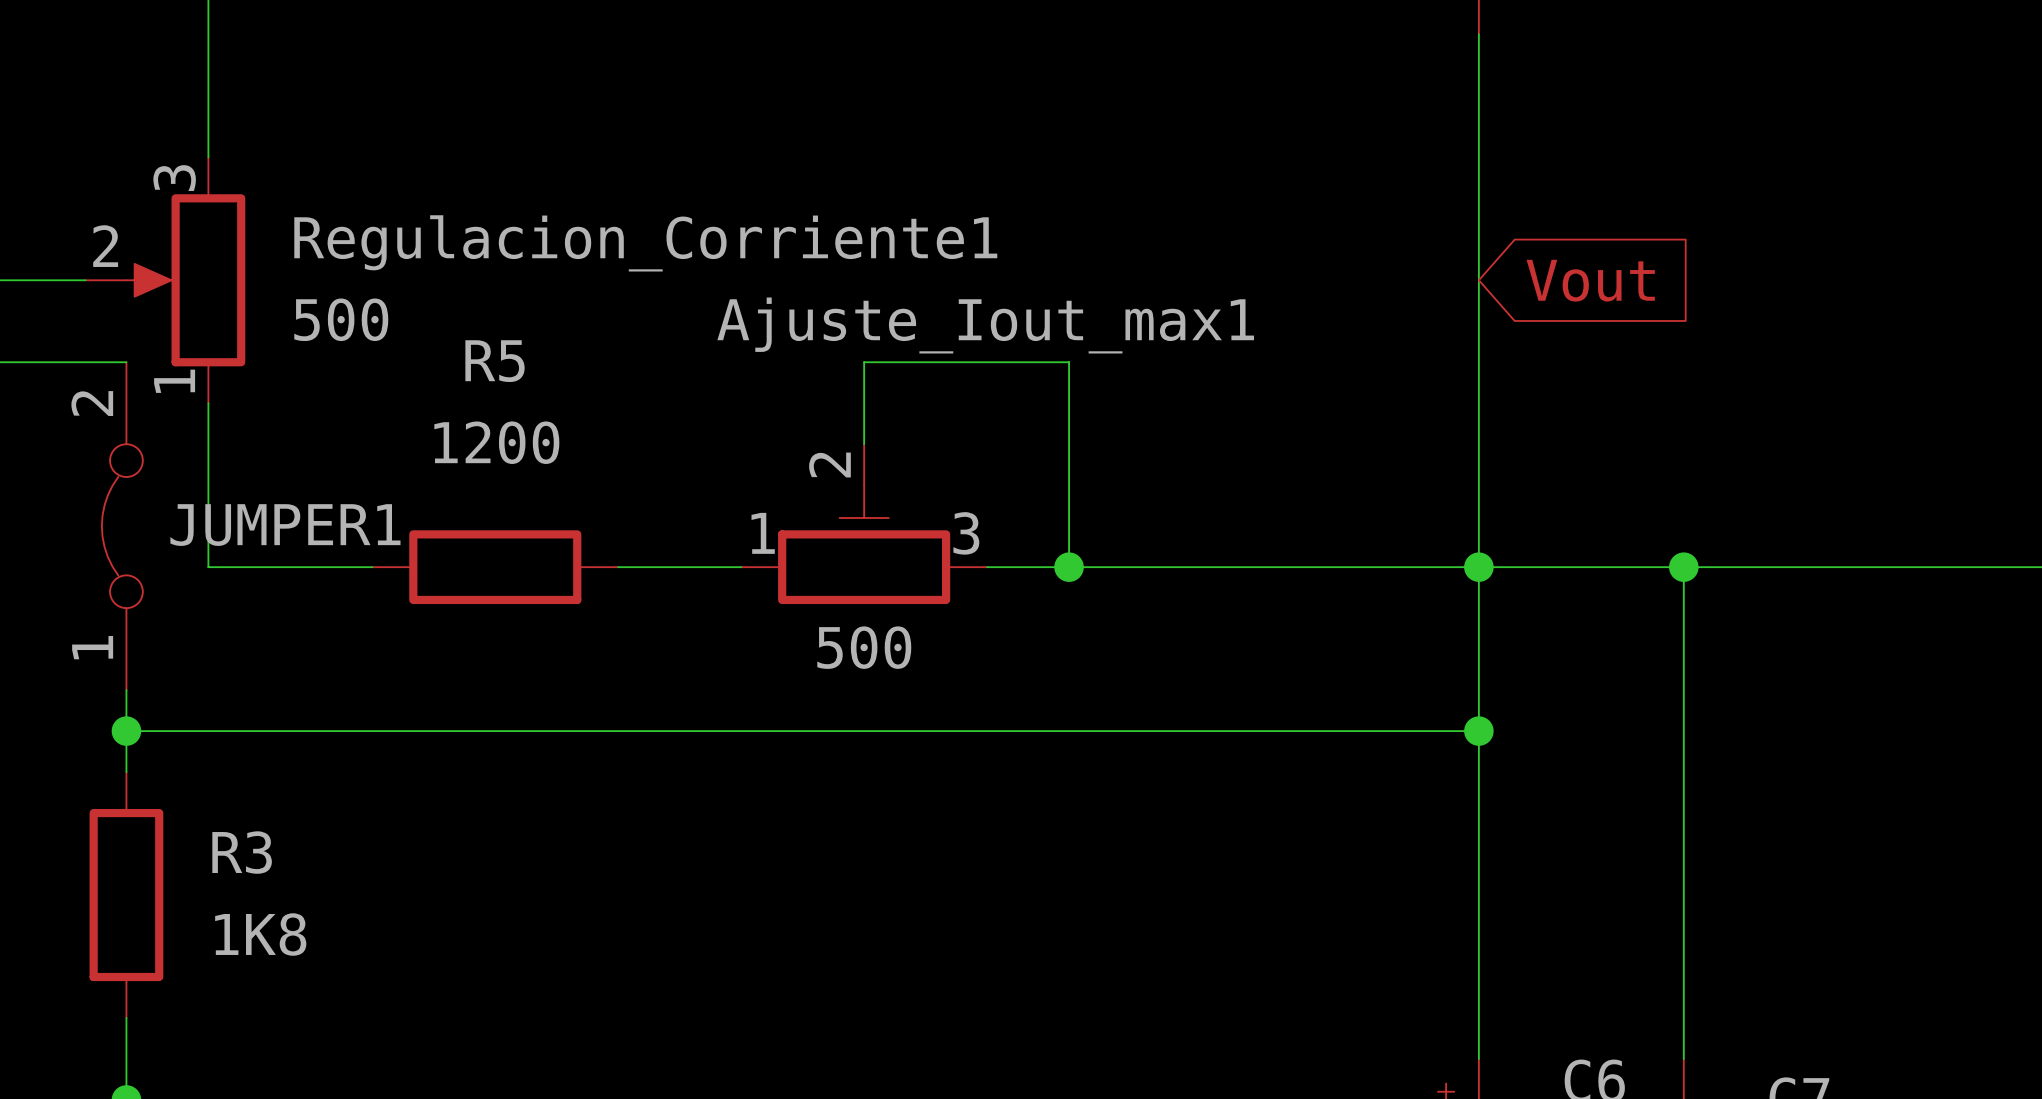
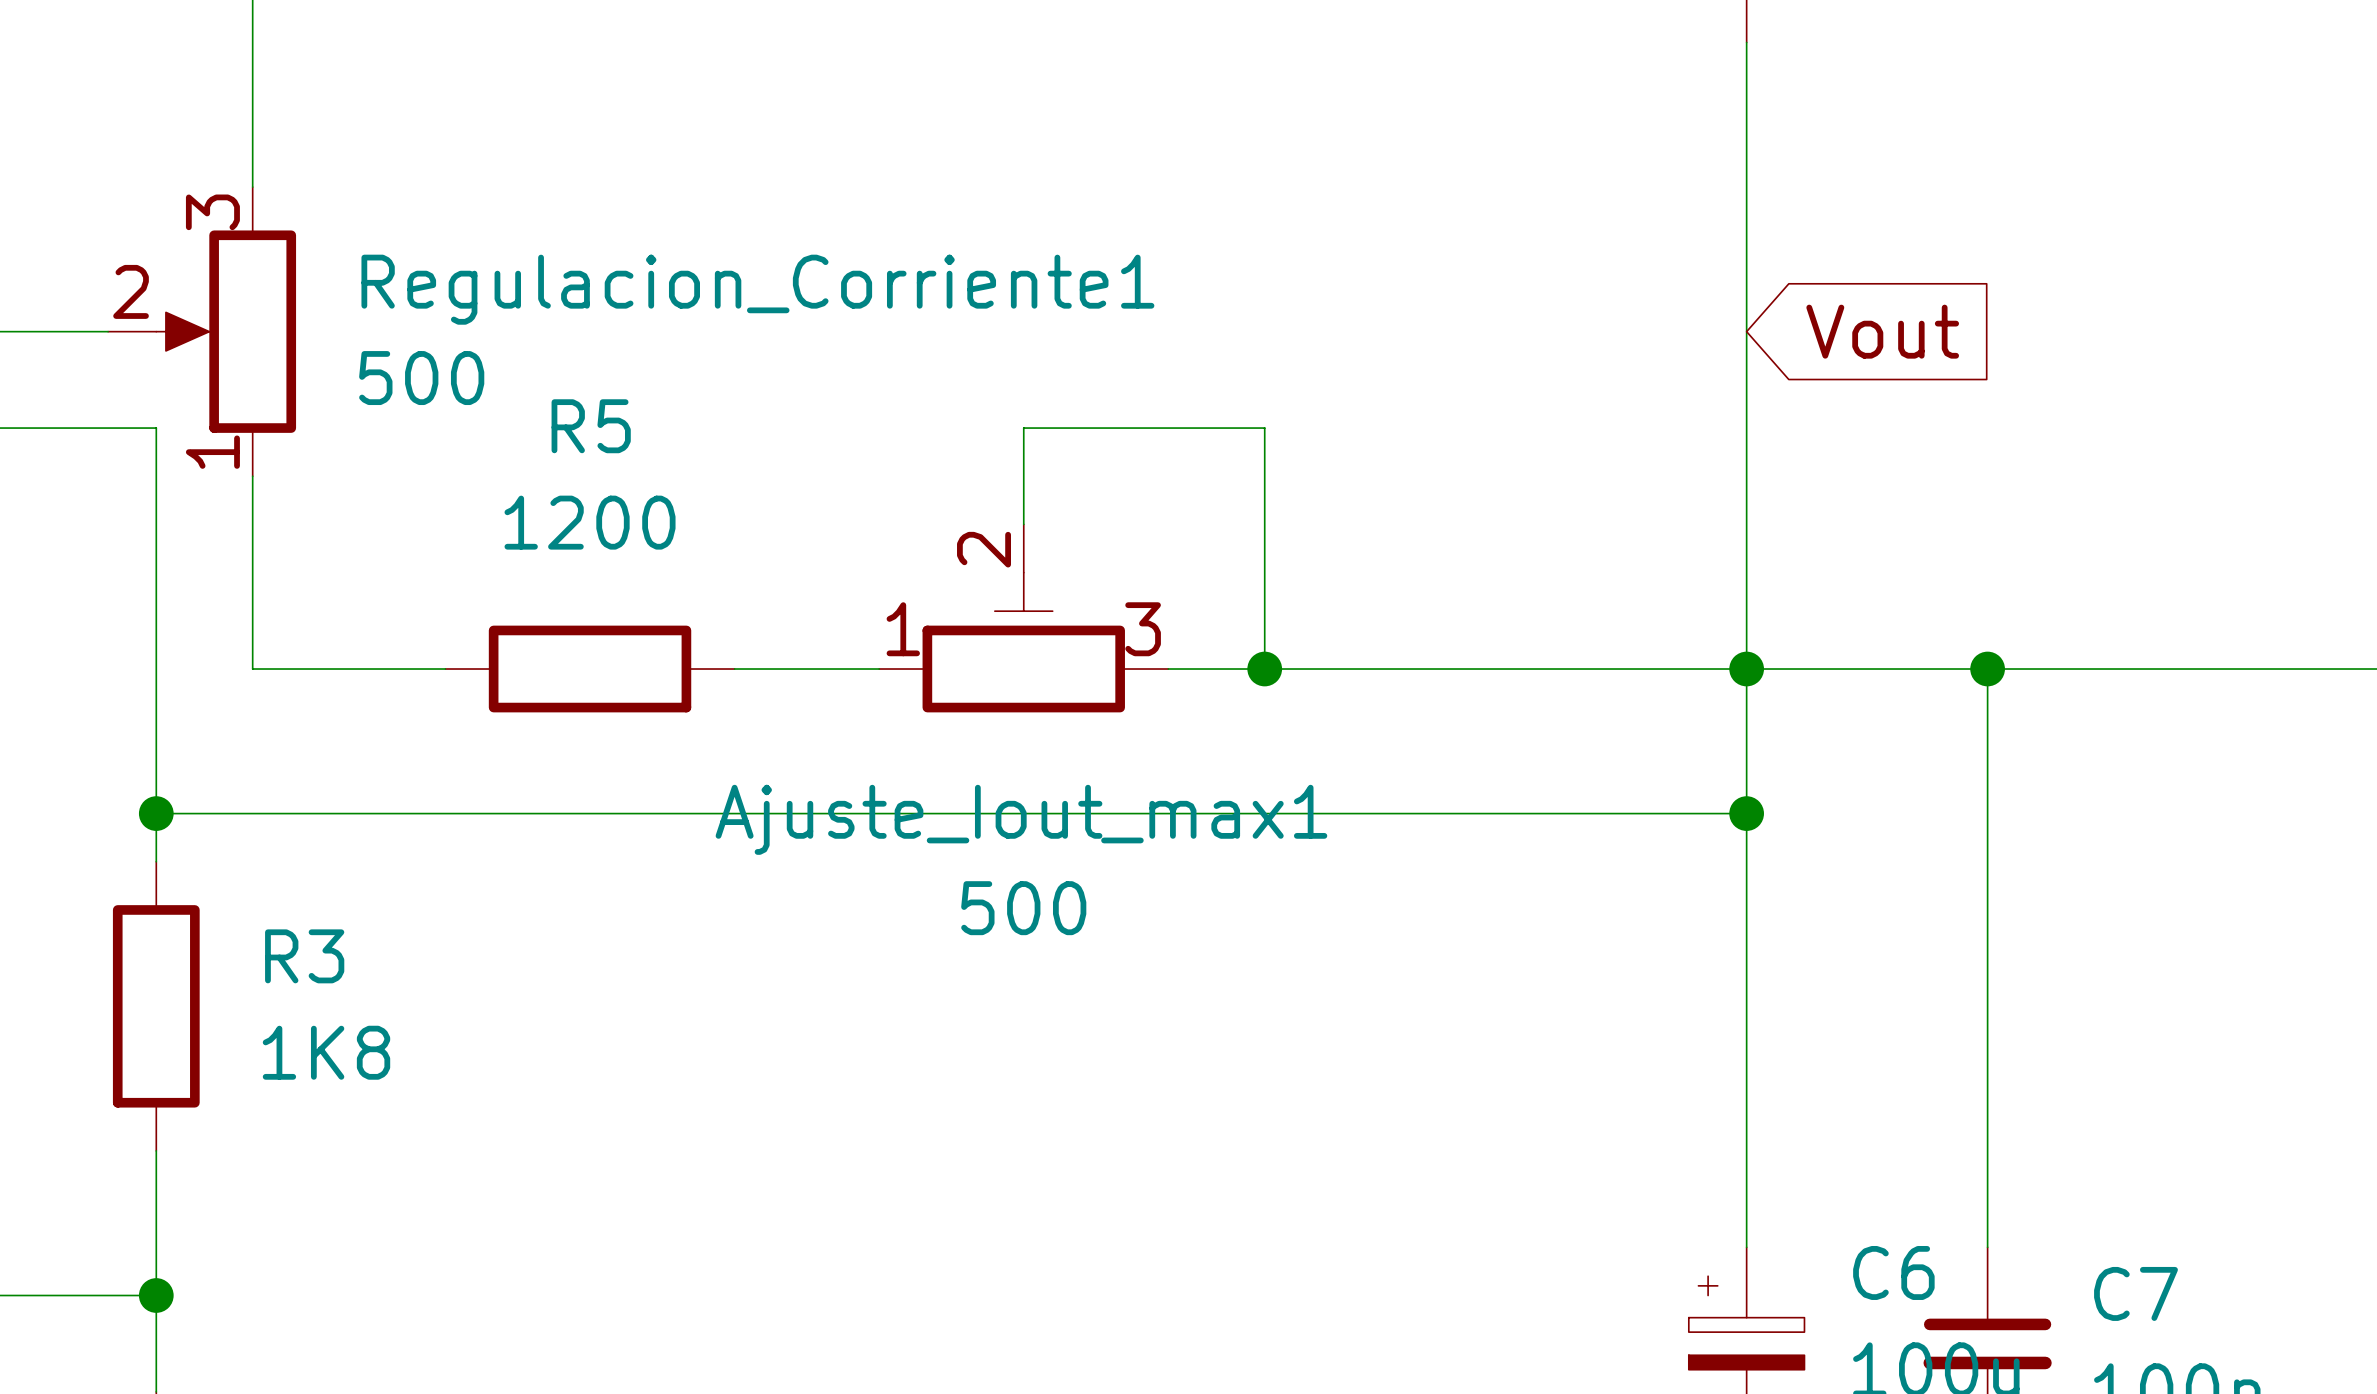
Ajuste_Iout_max1 name position: Ajuste_Iout_max1 (985, 325) -> Ajuste_Iout_max1 (1021, 819)
wire: none -> (156, 428) (156, 813) (1746, 813)
JUMPER1: (122, 526) -> none
Ajuste_Iout_max1 value position: 500 (864, 647) -> 500 (1023, 908)
junction position: (126, 731) -> (156, 813)
wire: (1478, 731) (126, 731) (126, 772) -> none
junction position: (1478, 731) -> (1746, 813)
R3 position: (126, 895) -> (156, 1006)

